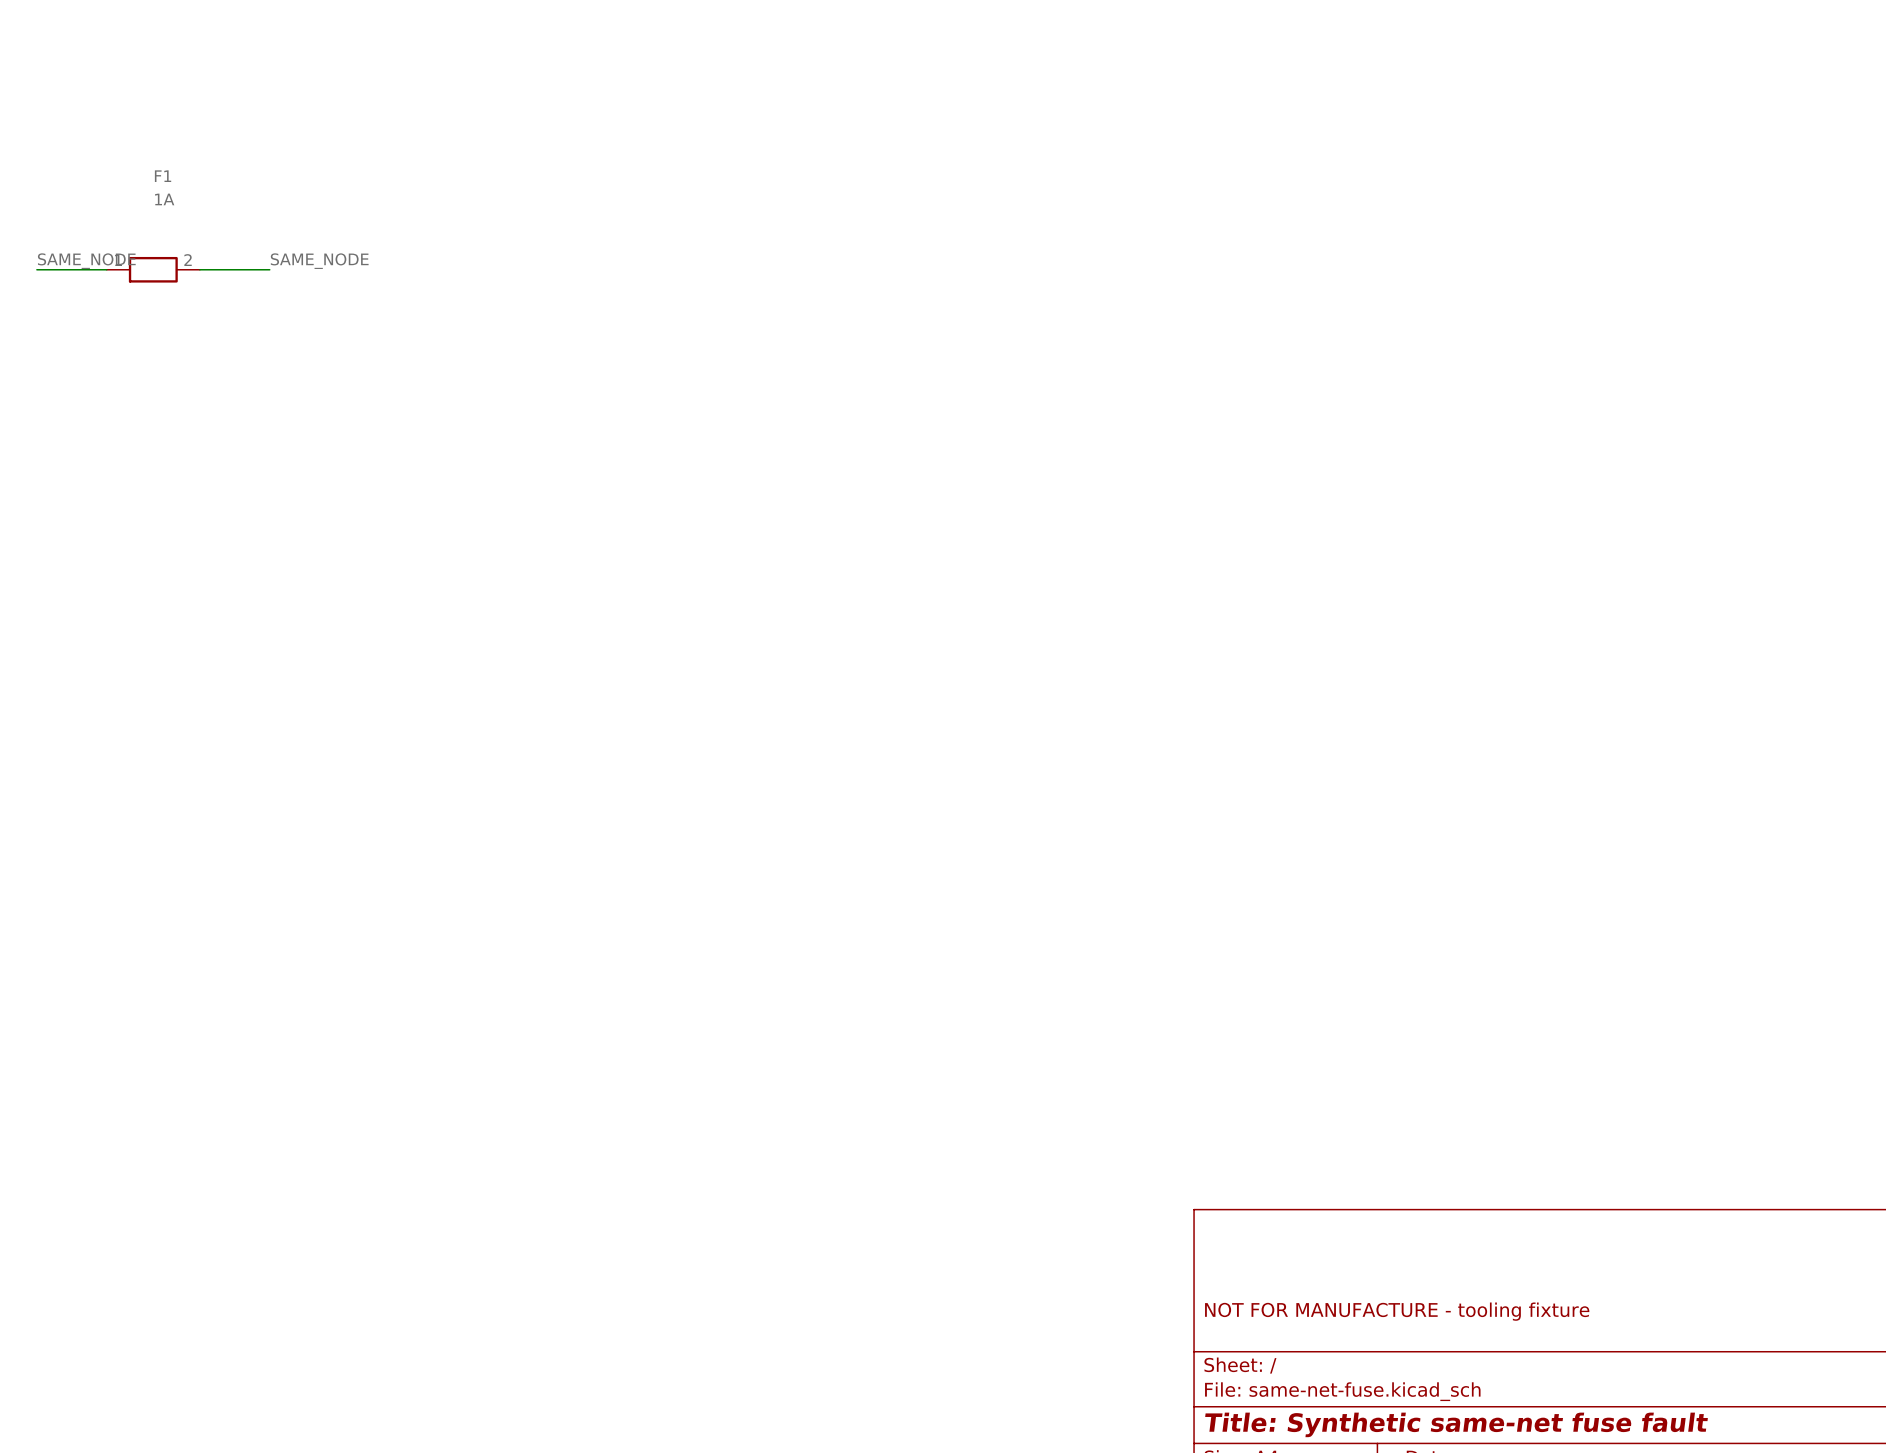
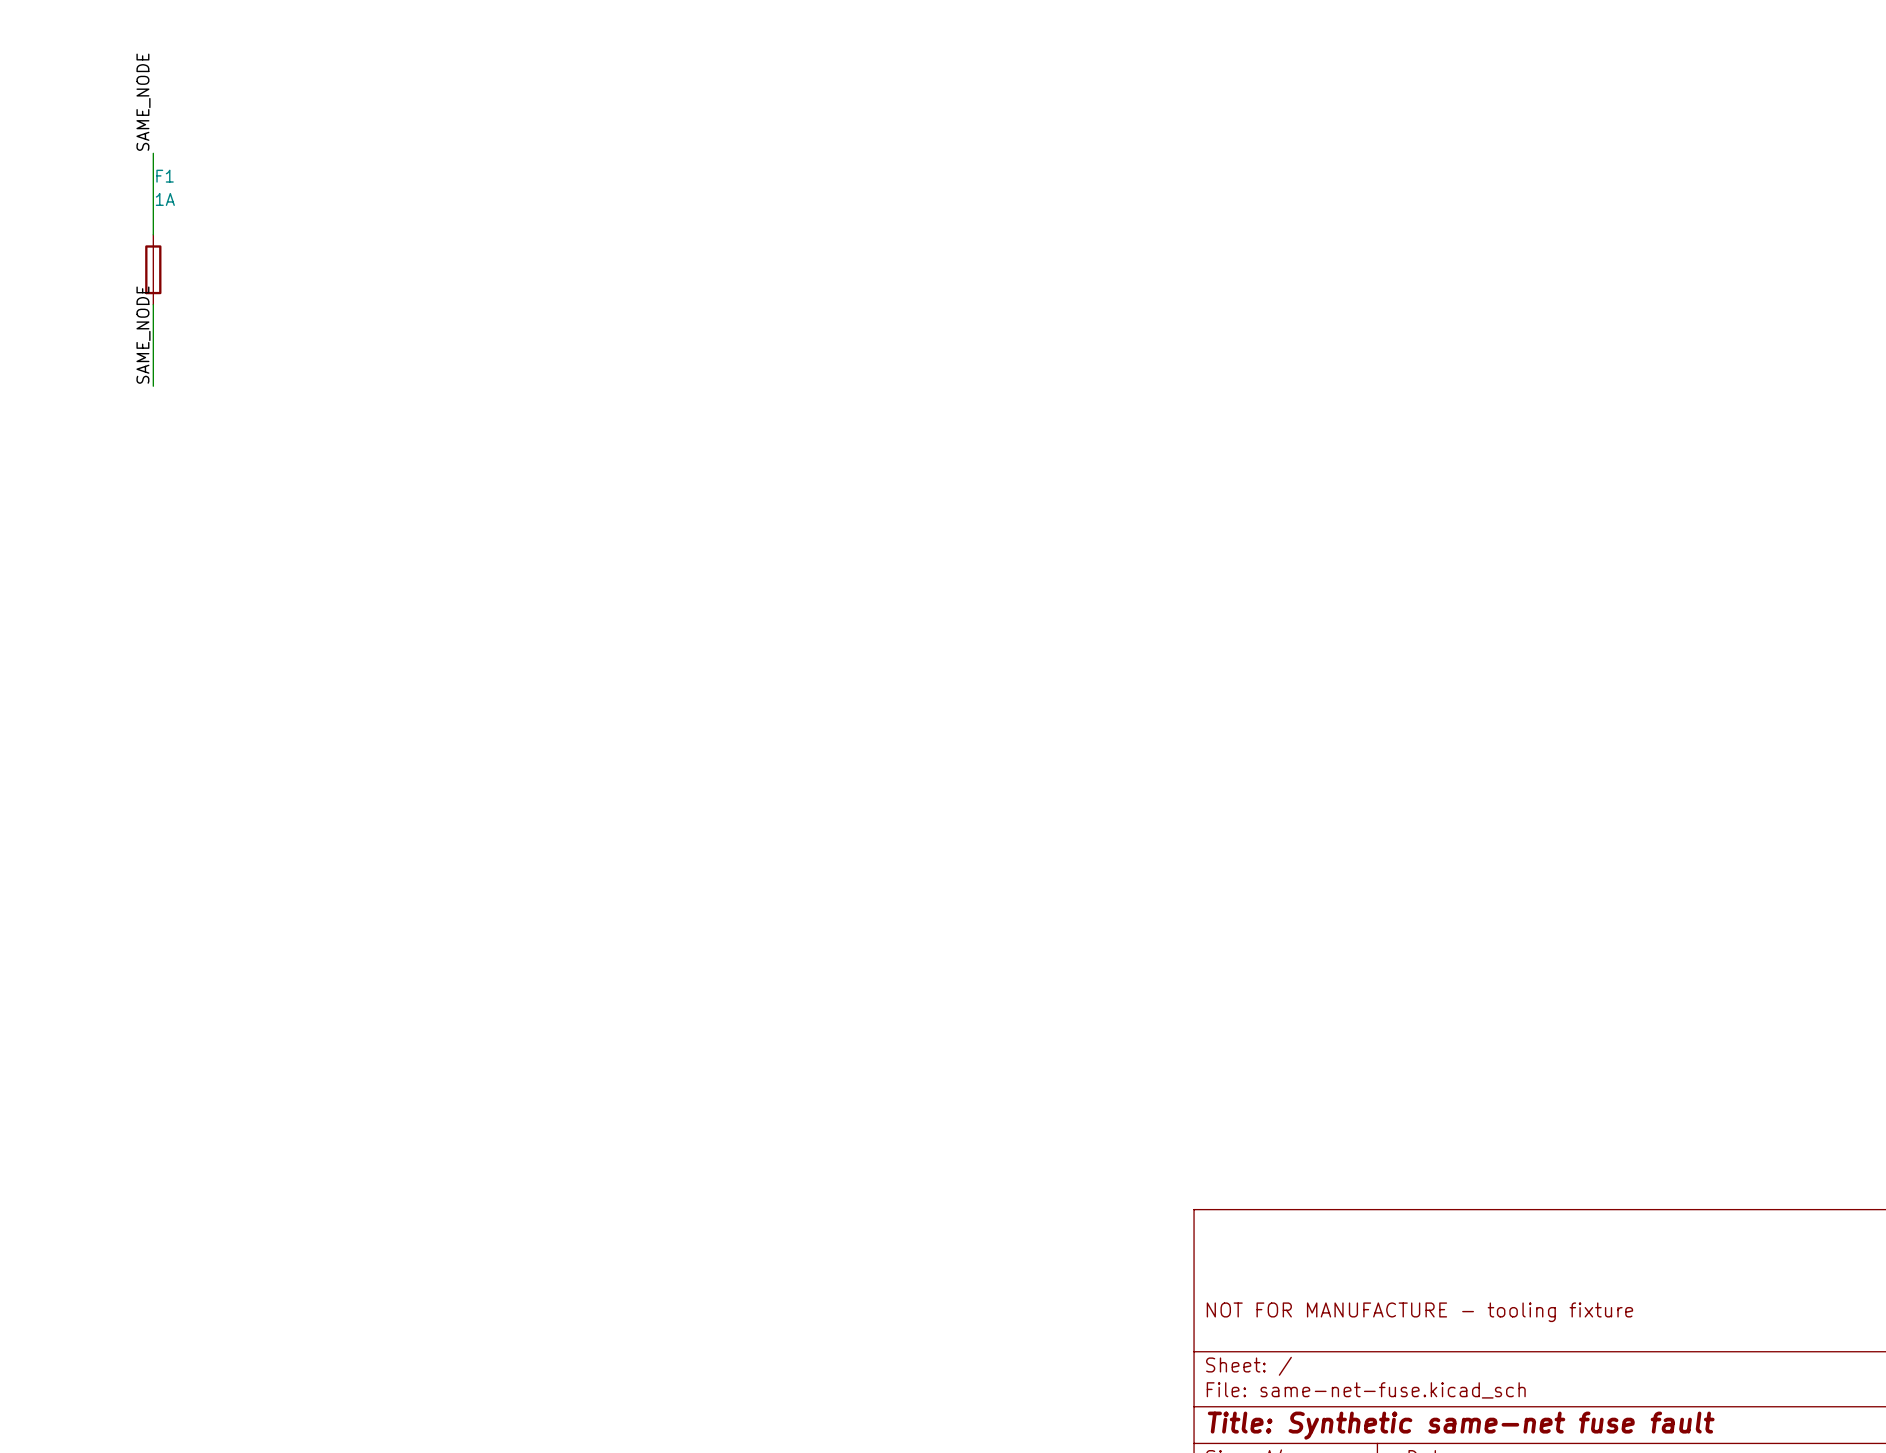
label: none -> SAME_NODE (143, 102)
wire: none -> (153, 153) (153, 234)
F1 symbol: [106, 256, 200, 283] -> [145, 234, 162, 305]
label rotation: 0° (86, 261) -> 90° counterclockwise (143, 335)
label: SAME_NODE (319, 261) -> none
wire: (36, 269) (106, 269) -> none
wire: (199, 269) (269, 269) -> none
wire: none -> (153, 304) (153, 386)

